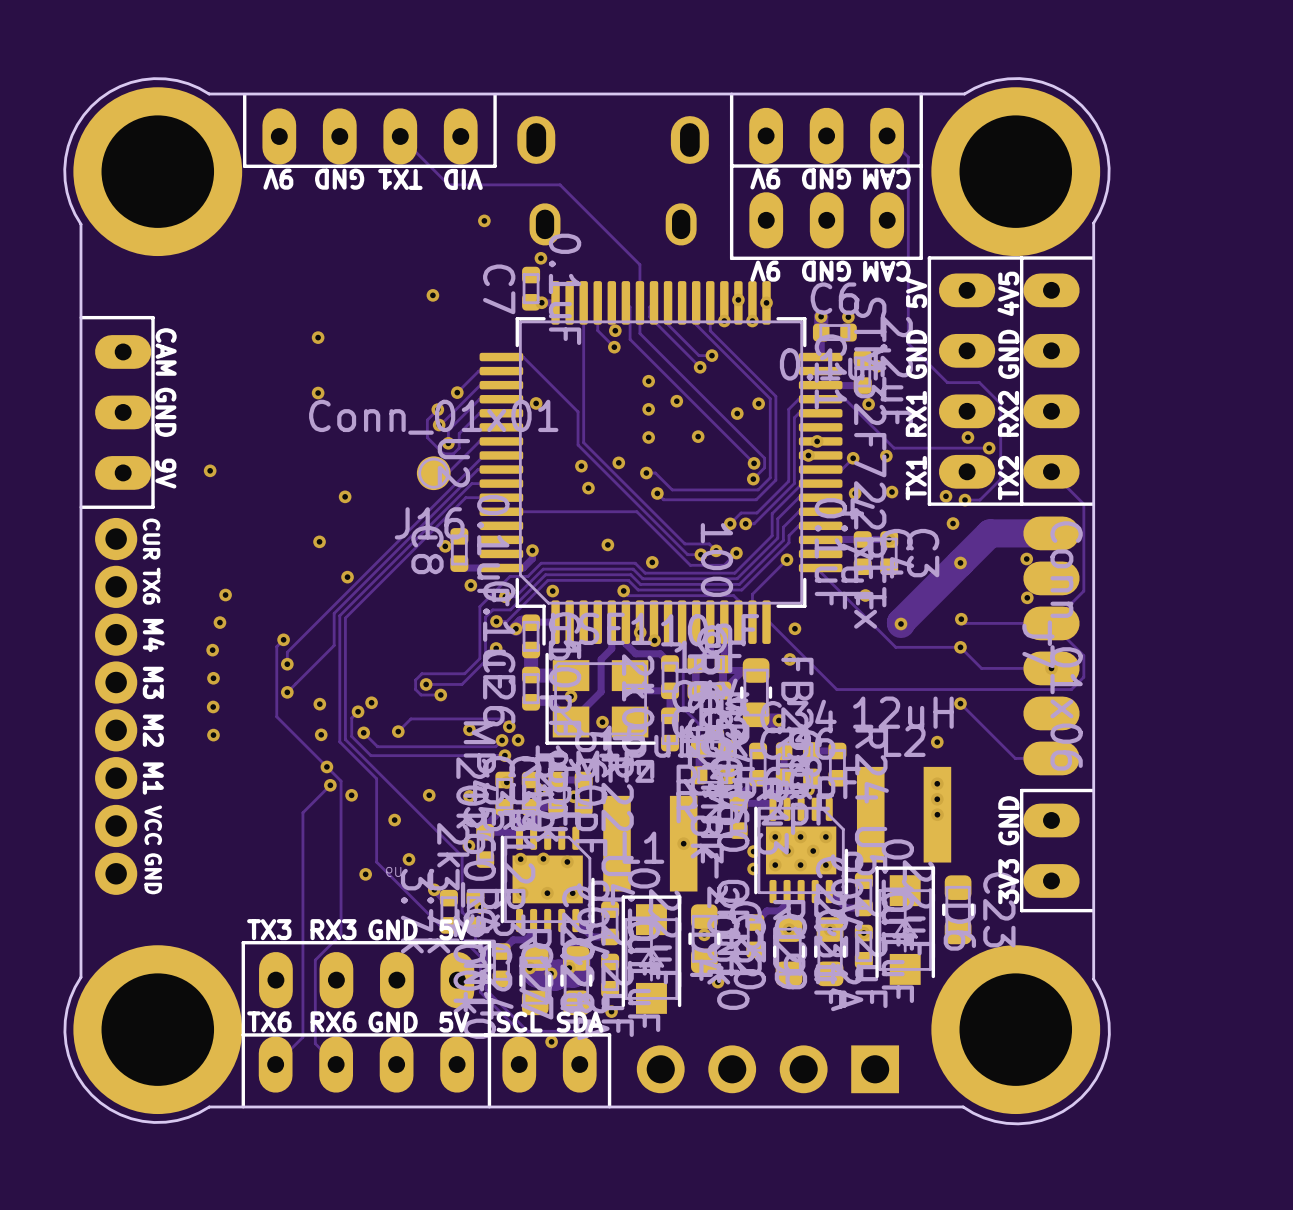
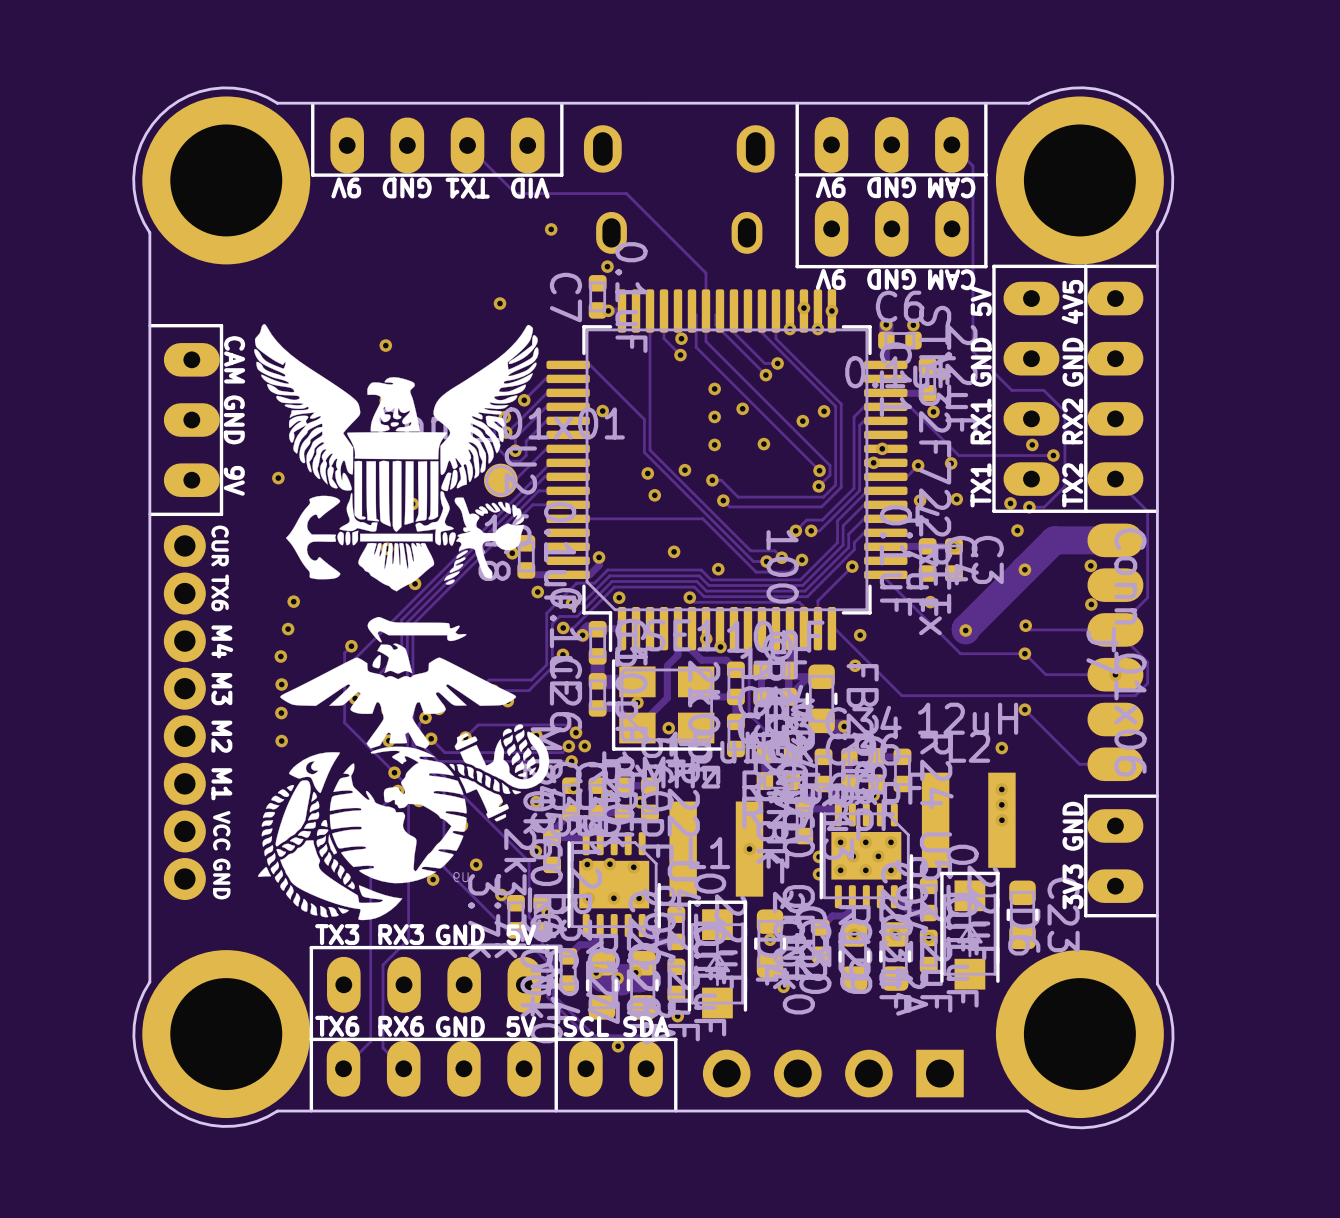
drawing: none -> [254, 324, 550, 921]

